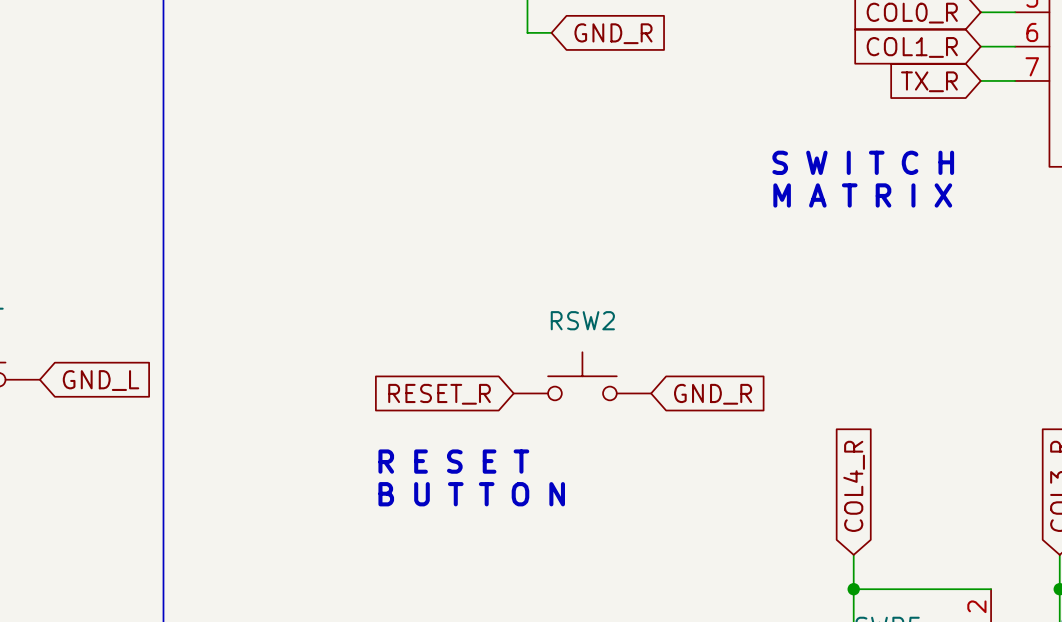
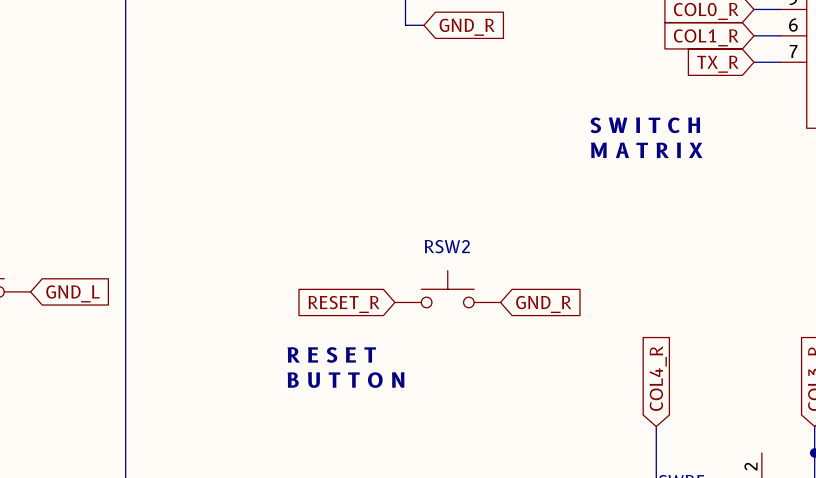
wire: (853, 589) (991, 589) -> none
junction: (853, 589) -> none

